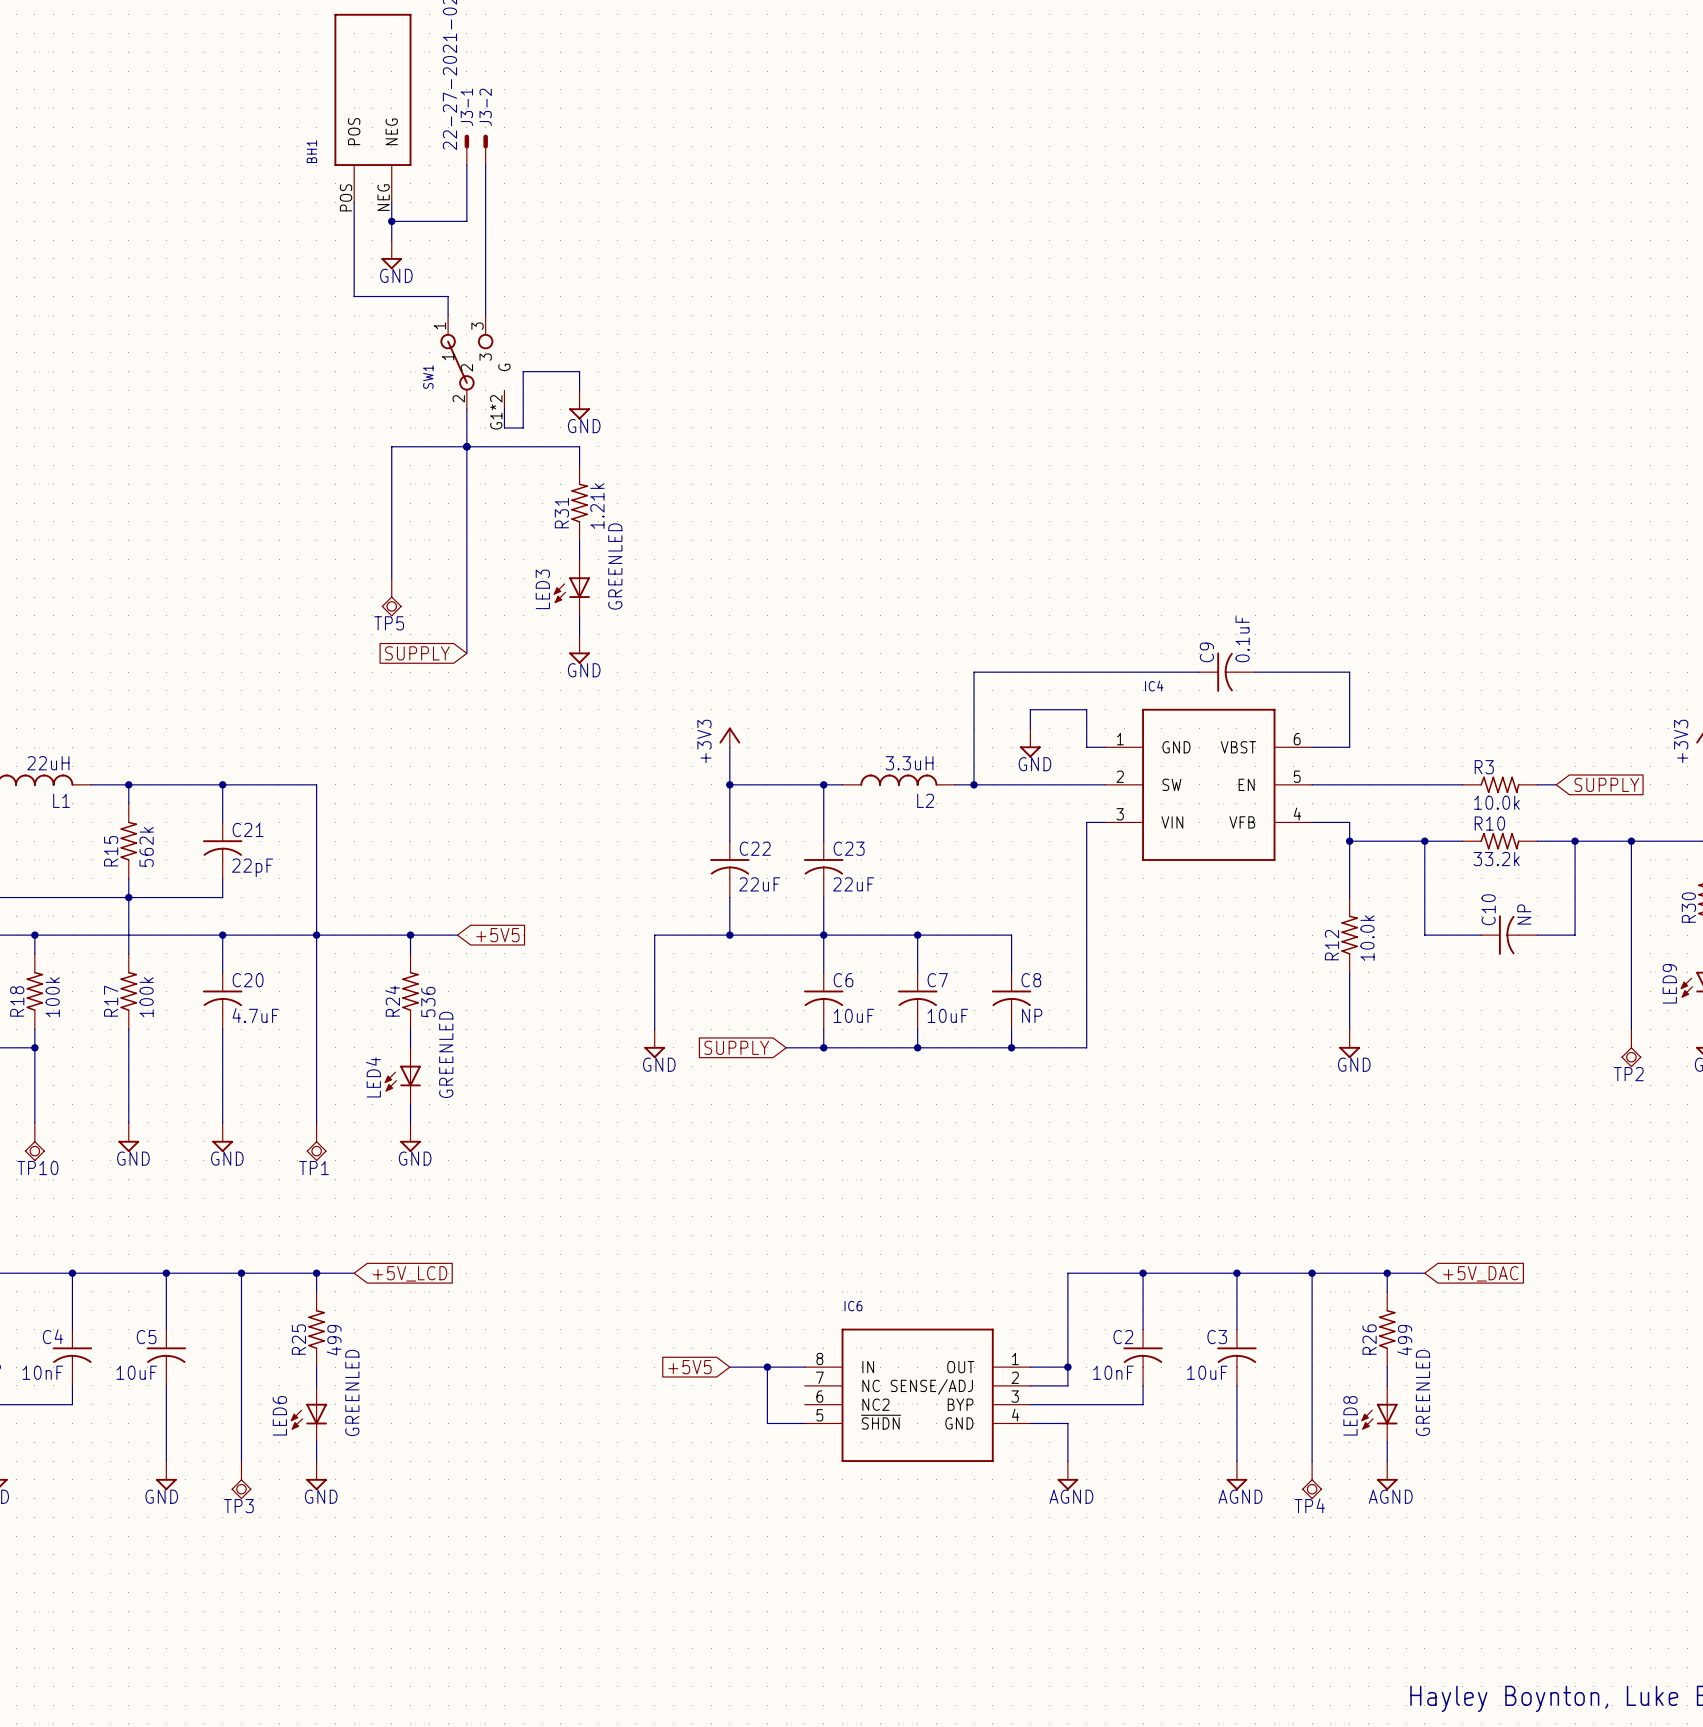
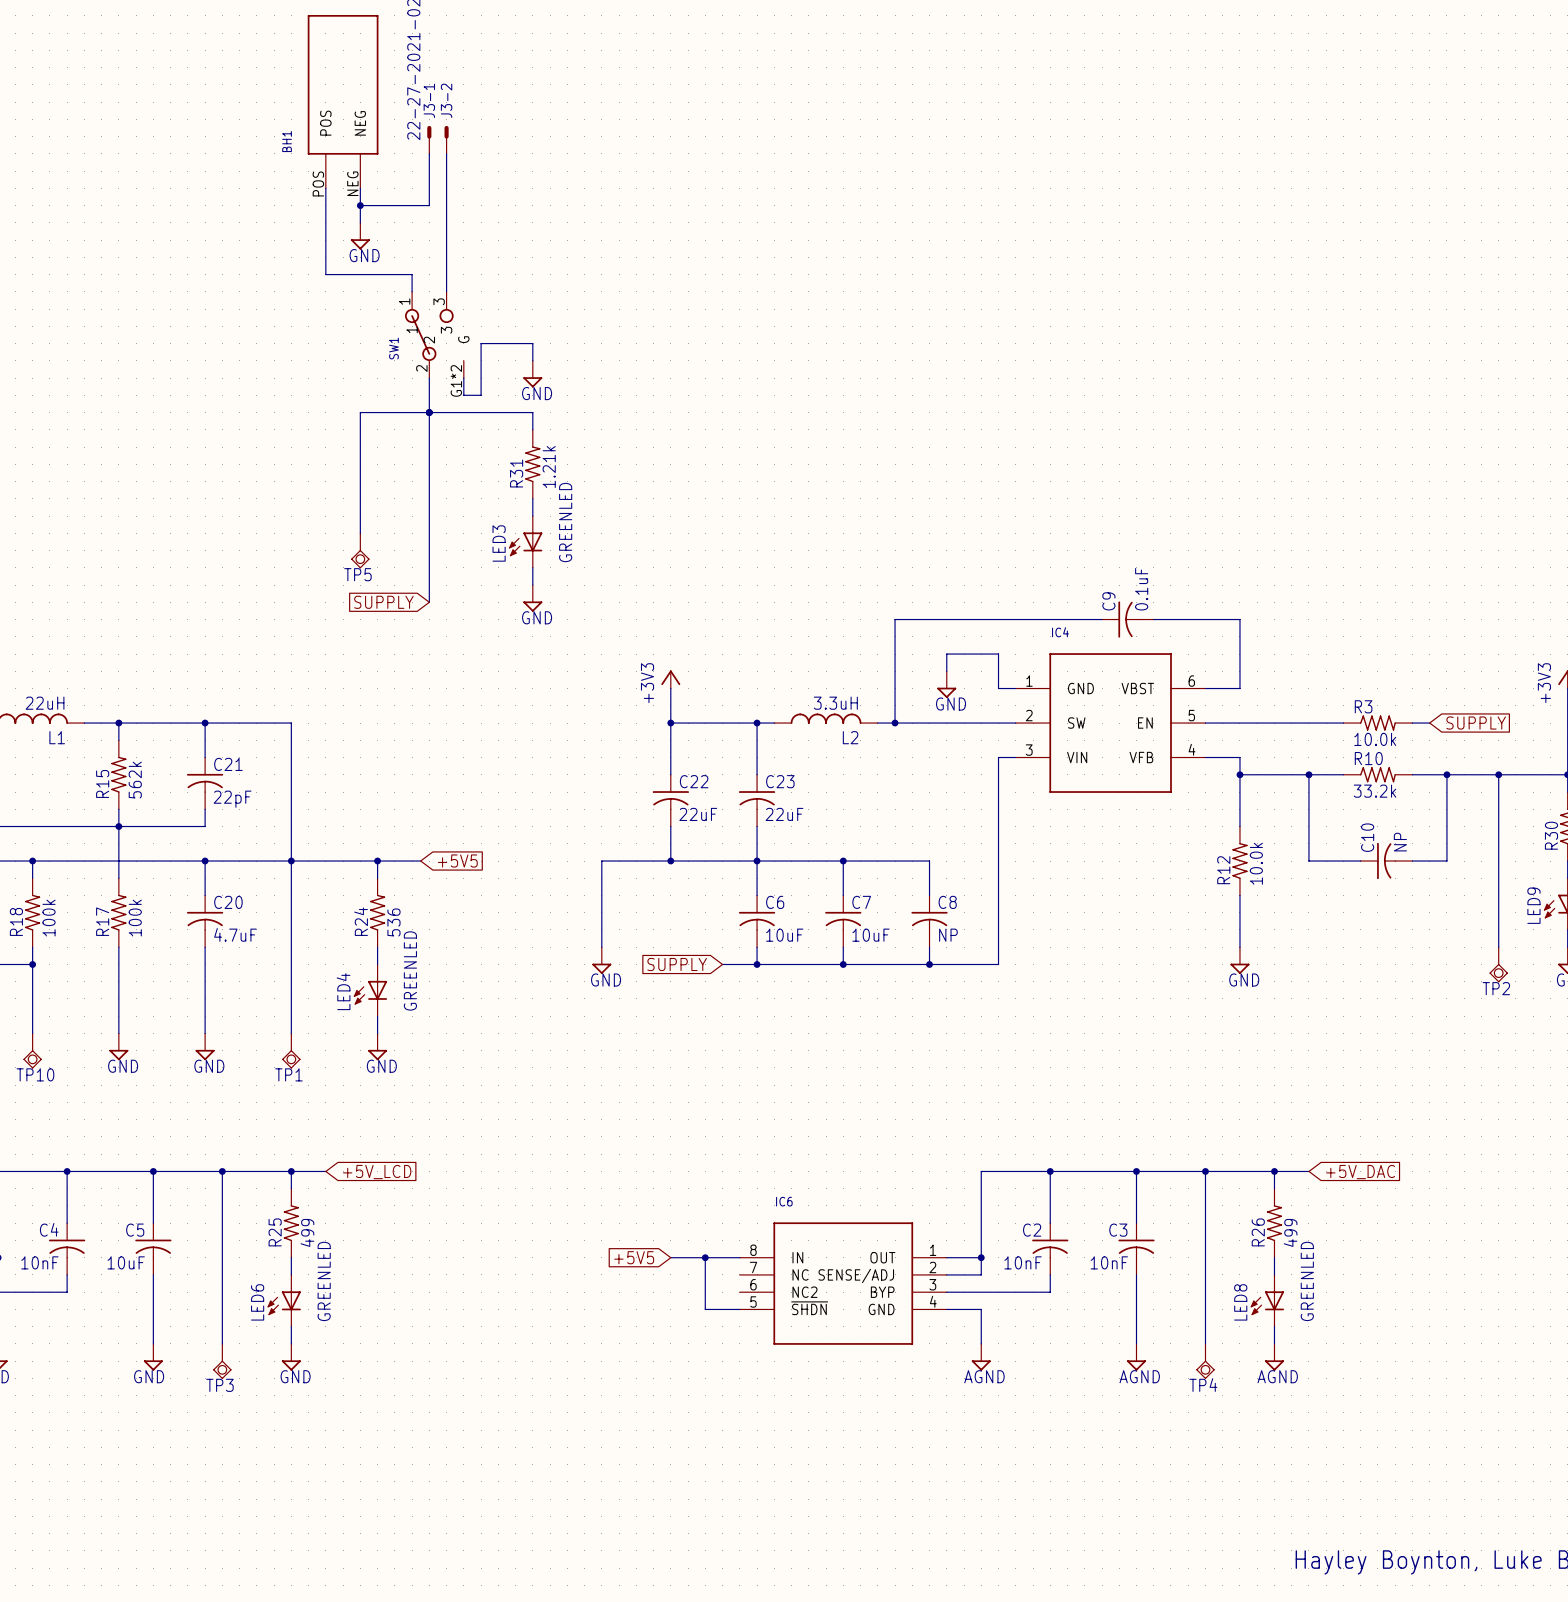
C3 value: 10uF (1207, 1372) -> 10nF (1109, 1262)

